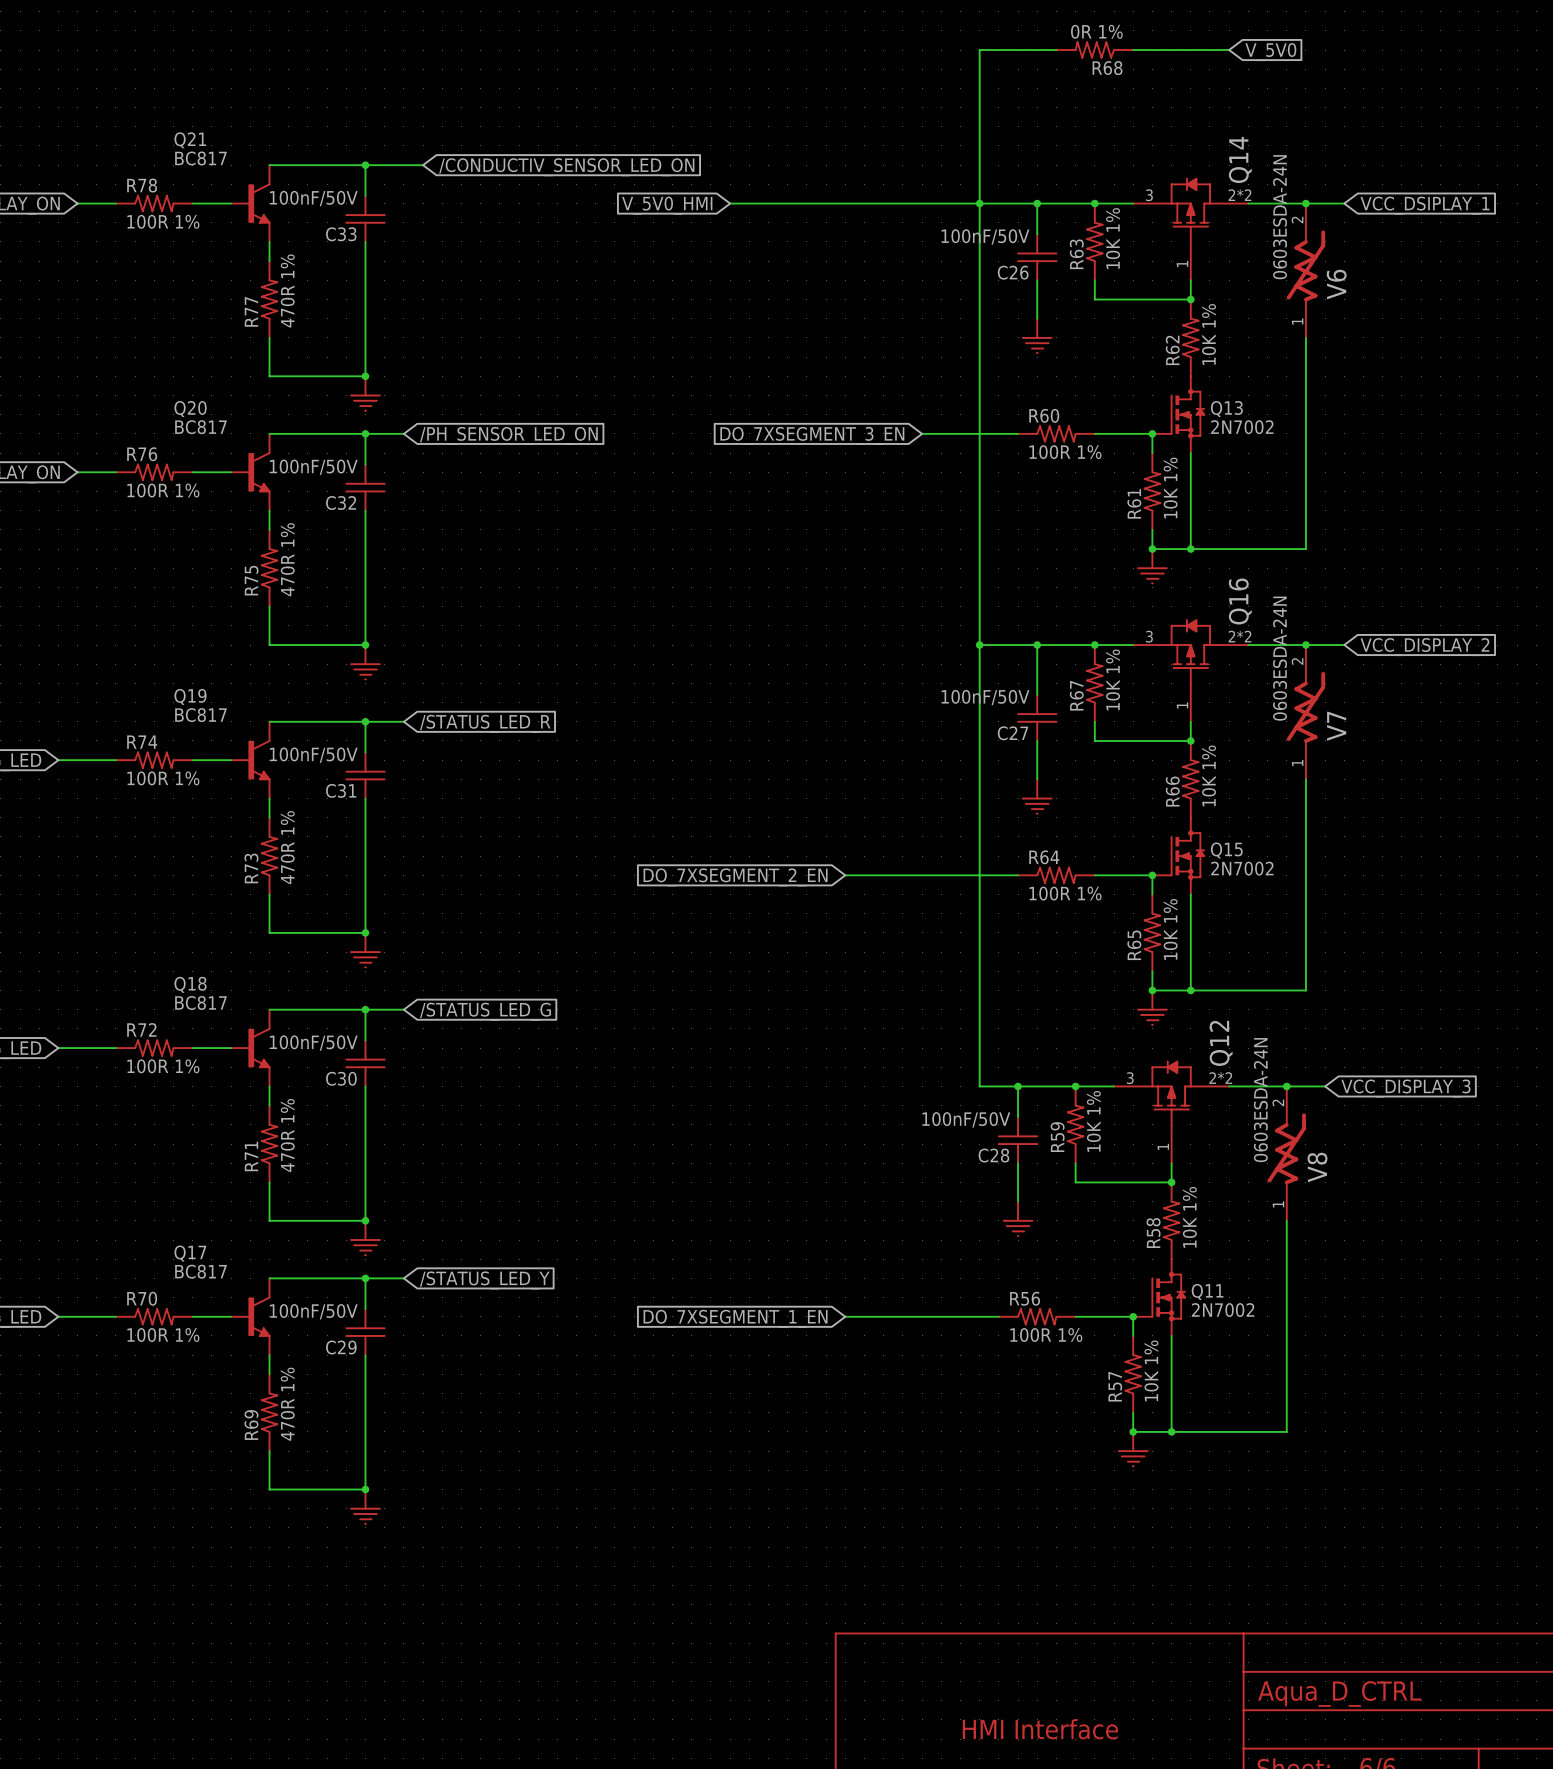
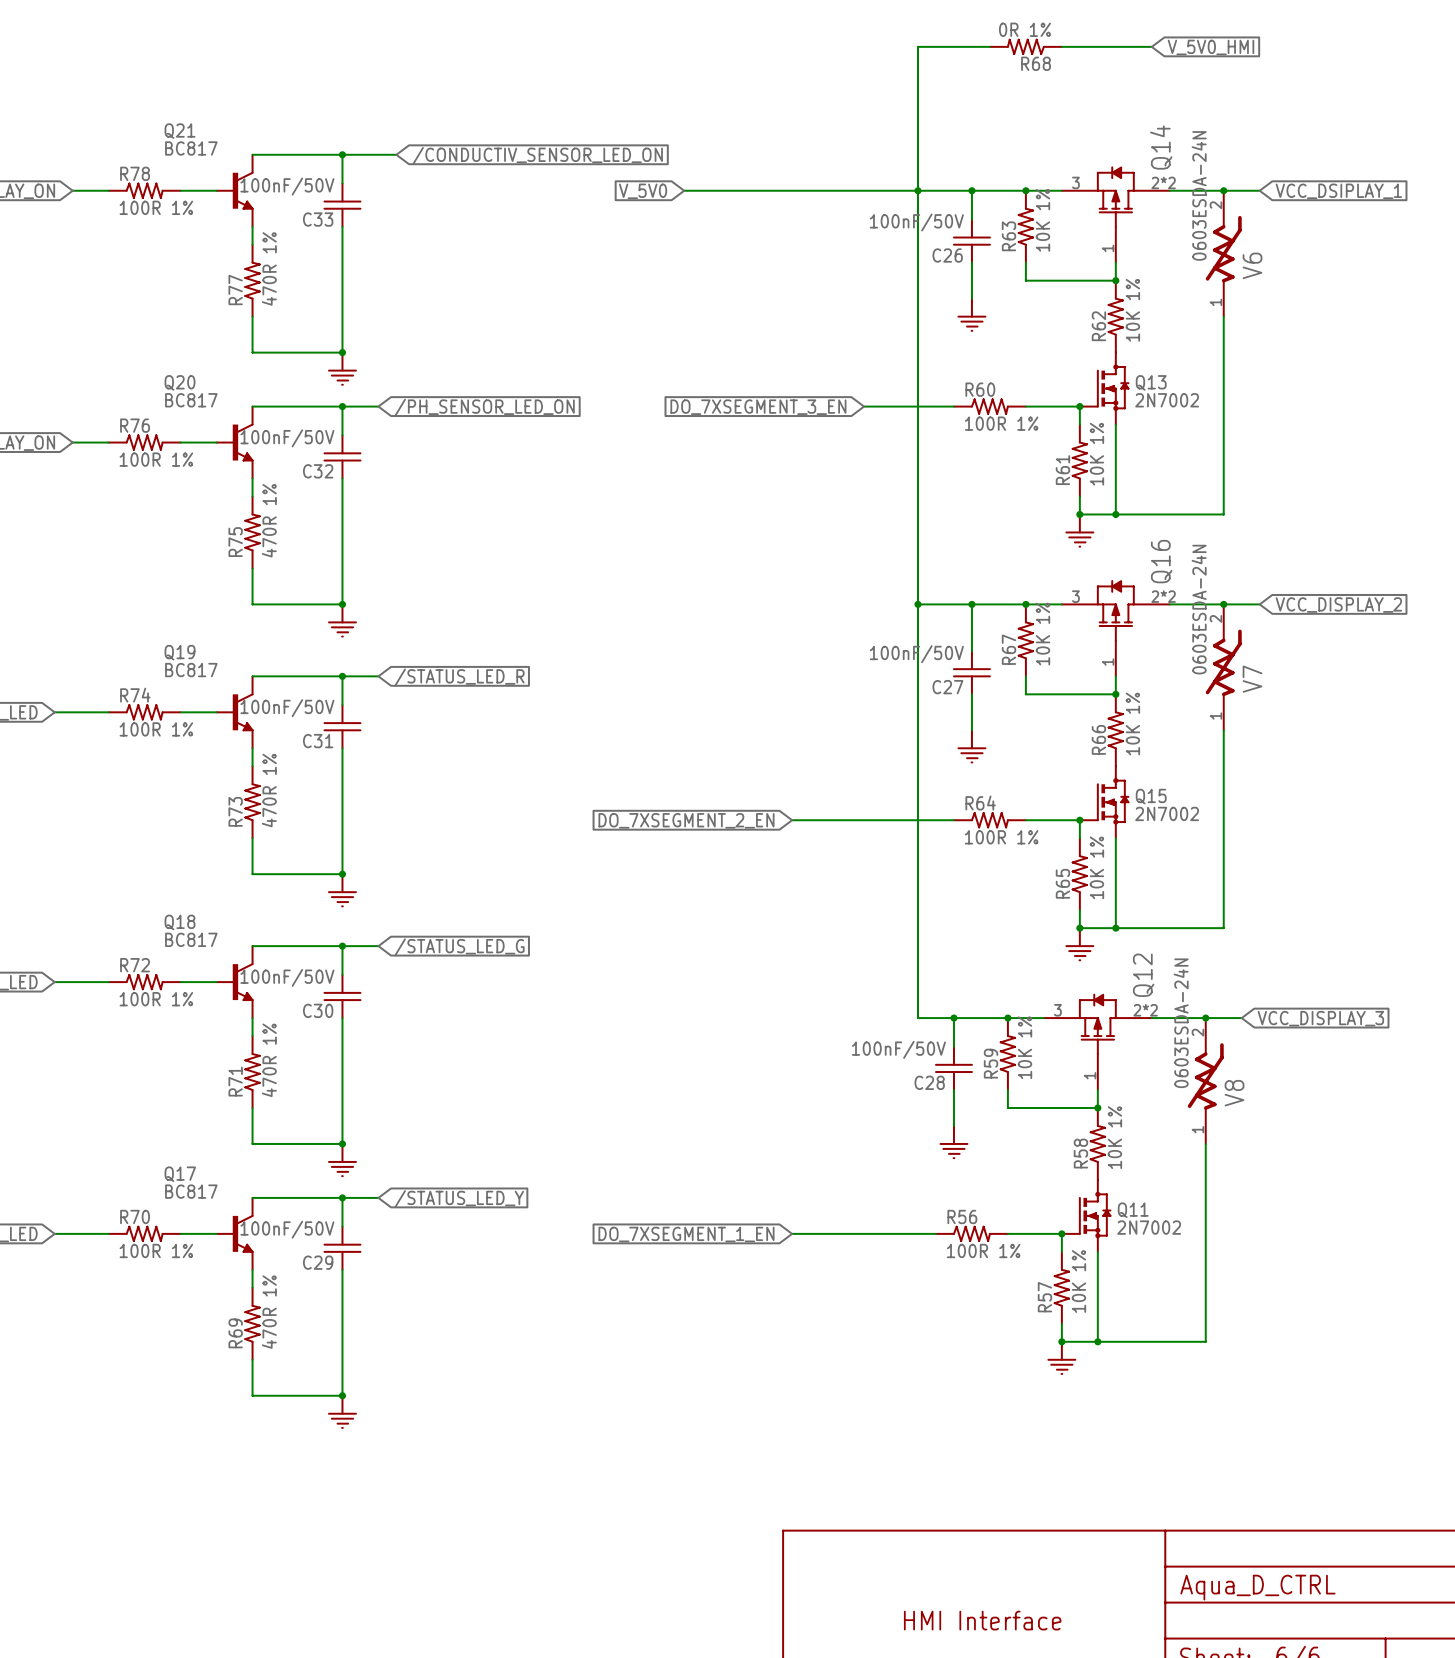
global label: V_5V0 (1270, 52) -> V_5V0_HMI (1211, 47)
global label: V_5V0_HMI (667, 205) -> V_5V0 (643, 191)

